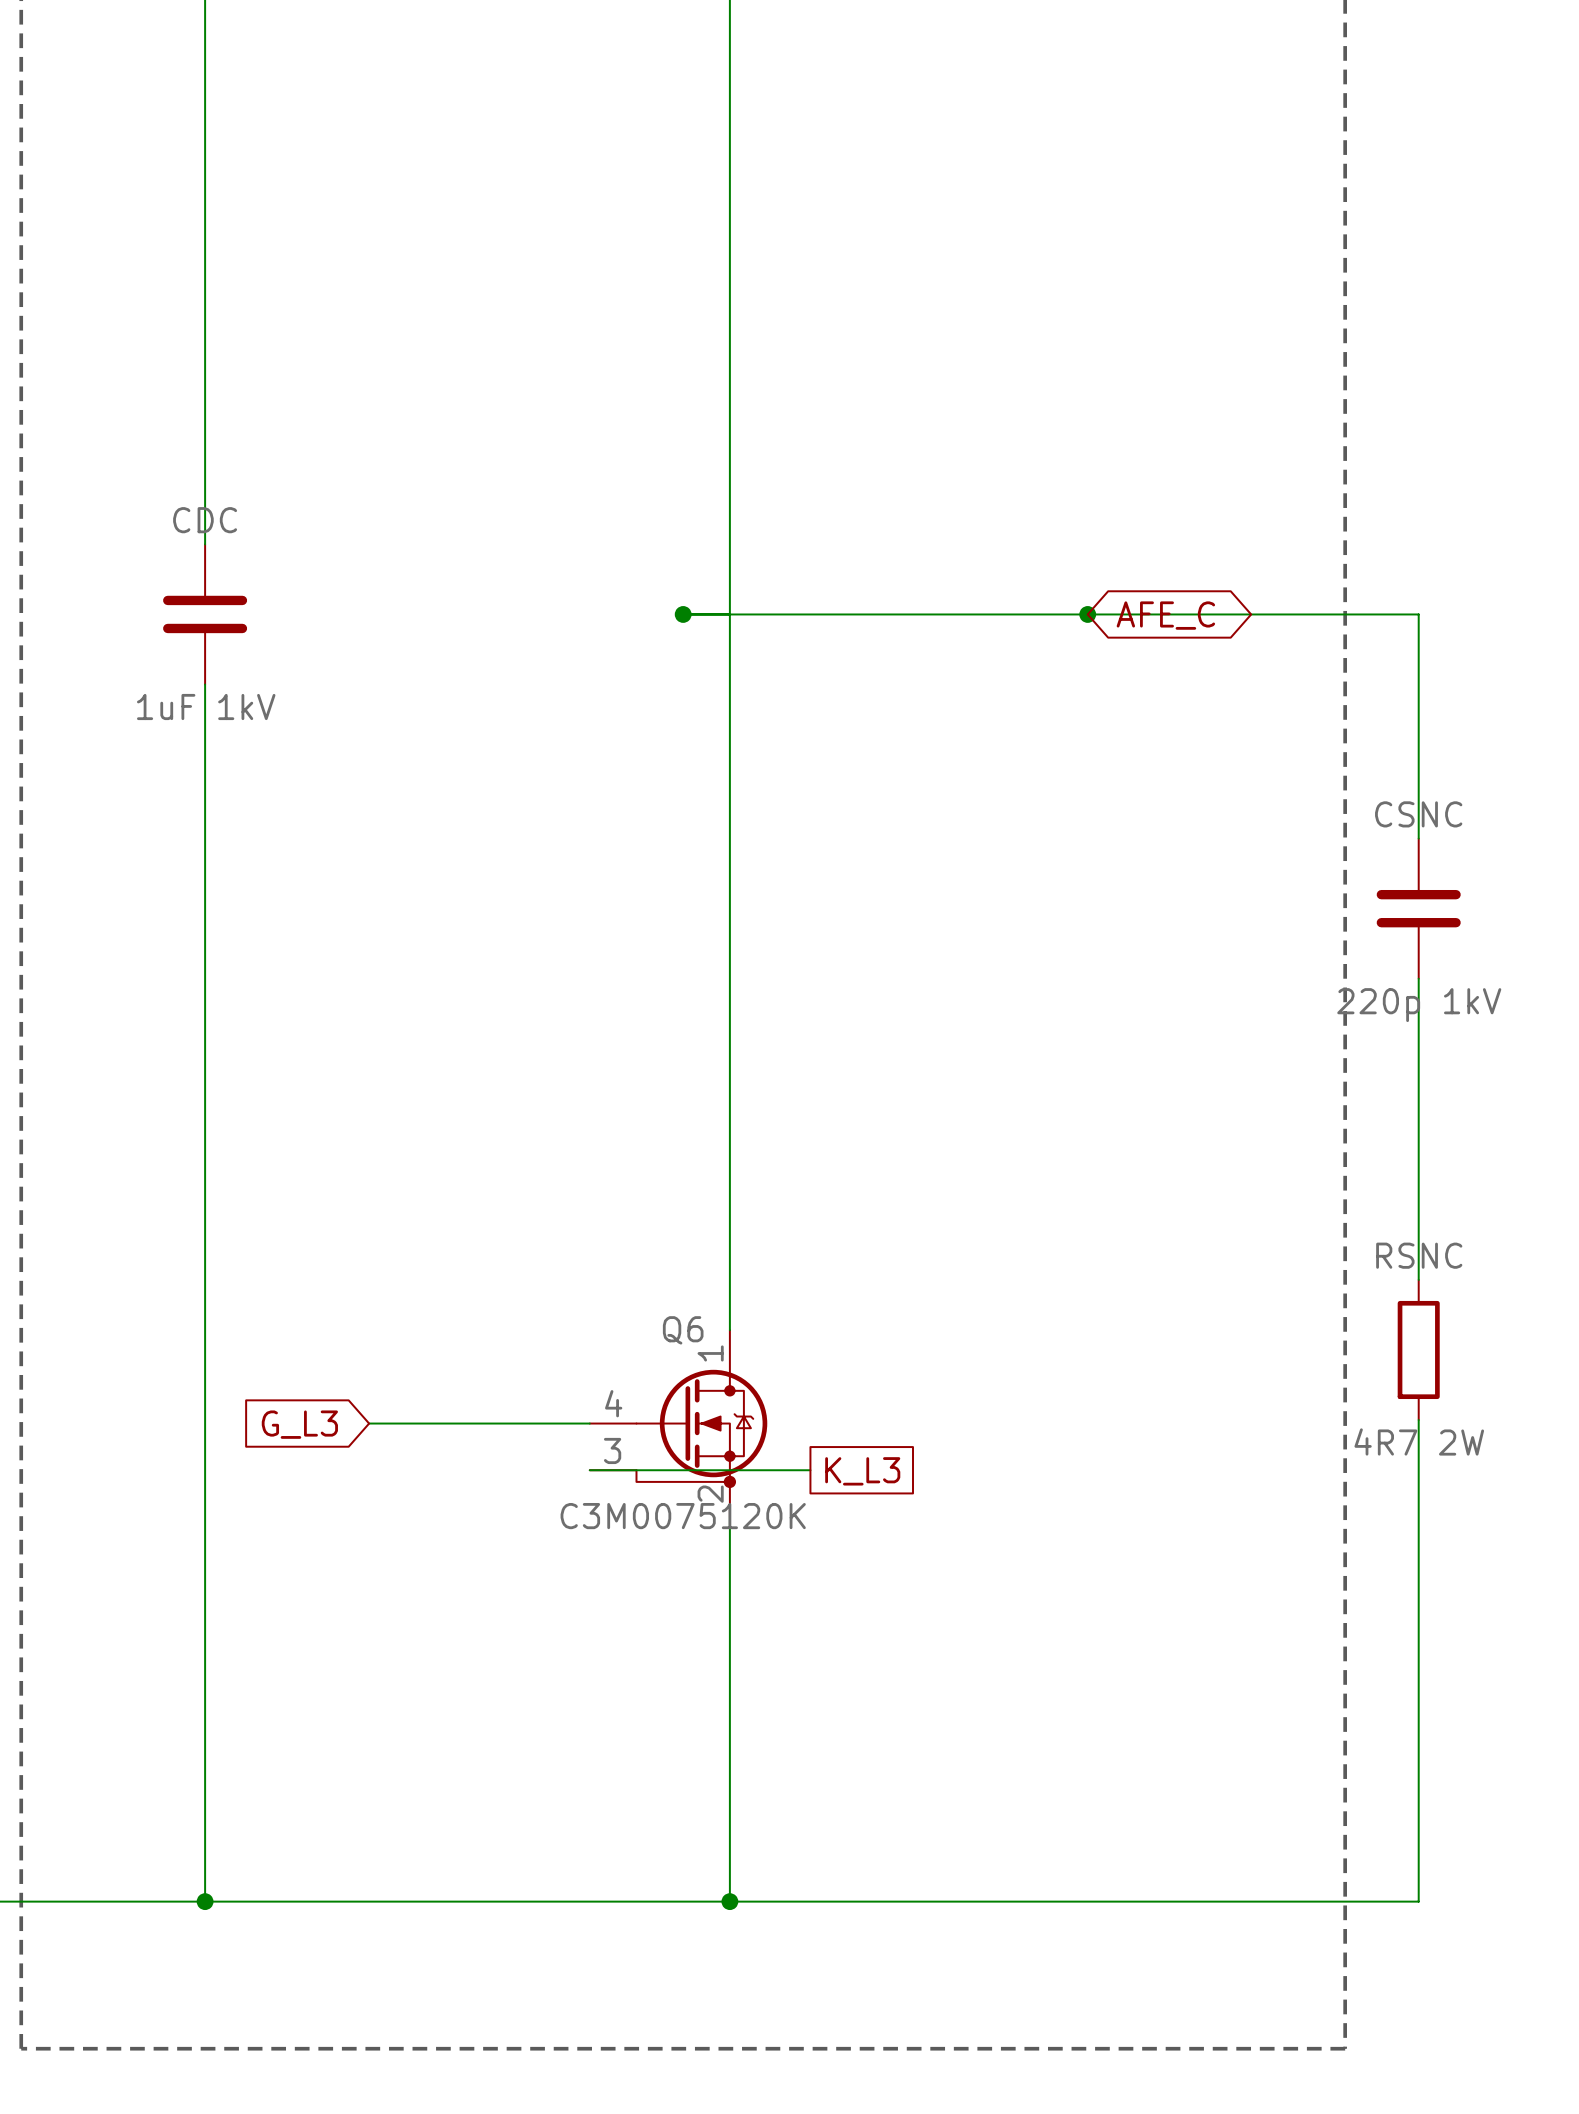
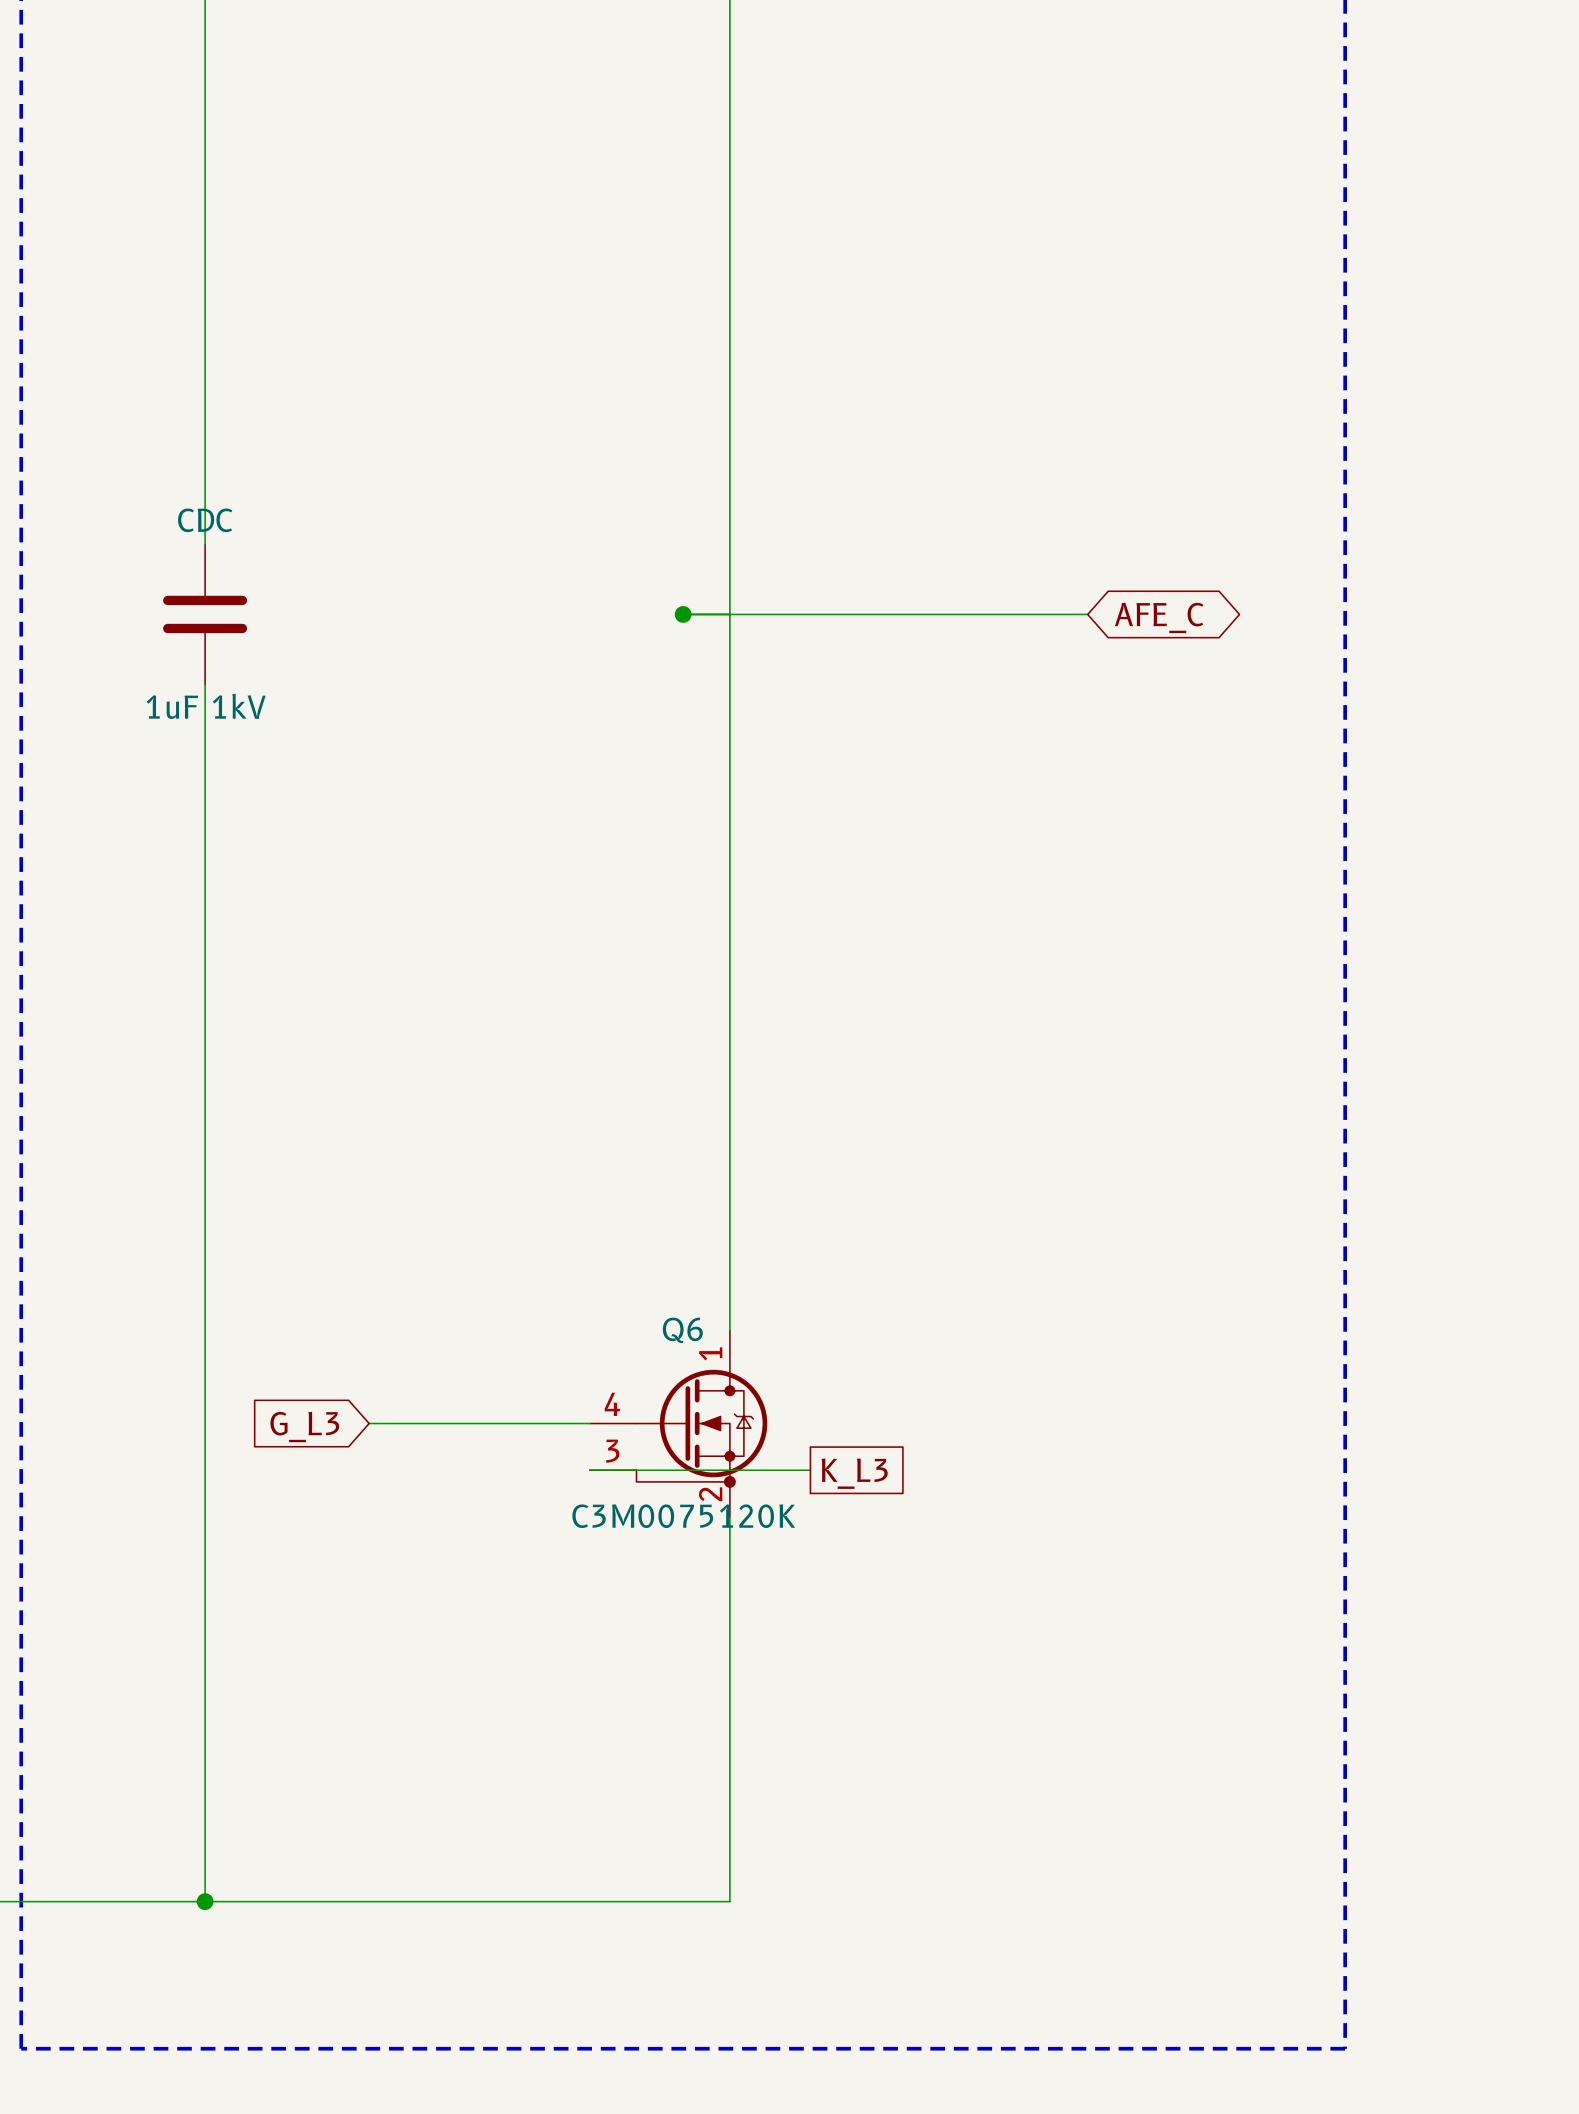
wire: (1087, 614) (1418, 614) (1418, 838) -> none
junction: (1087, 614) -> none
CSNC: 220p 1kV (1418, 908) -> none
wire: (1418, 978) (1418, 1279) -> none
RSNC: 4R7 2W (1418, 1349) -> none
wire: (1418, 1420) (1418, 1901) (729, 1901) -> none
junction: (729, 1901) -> none

